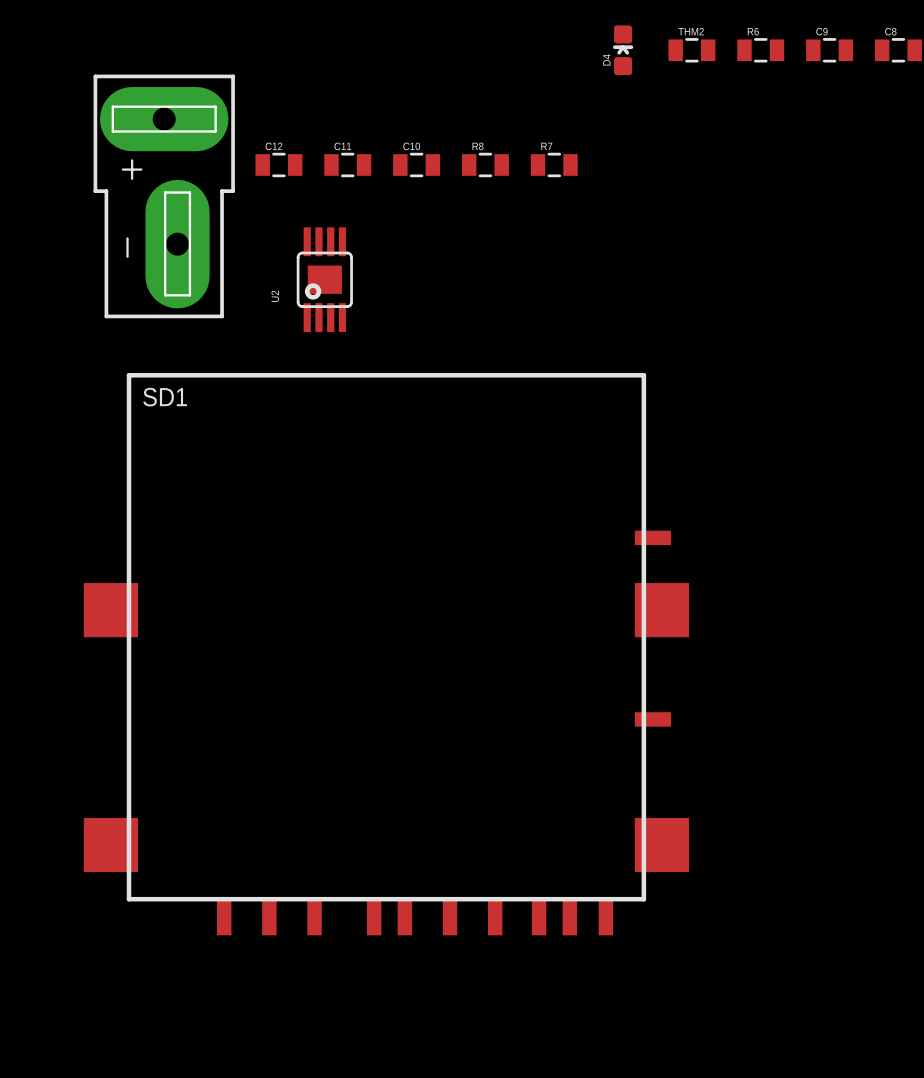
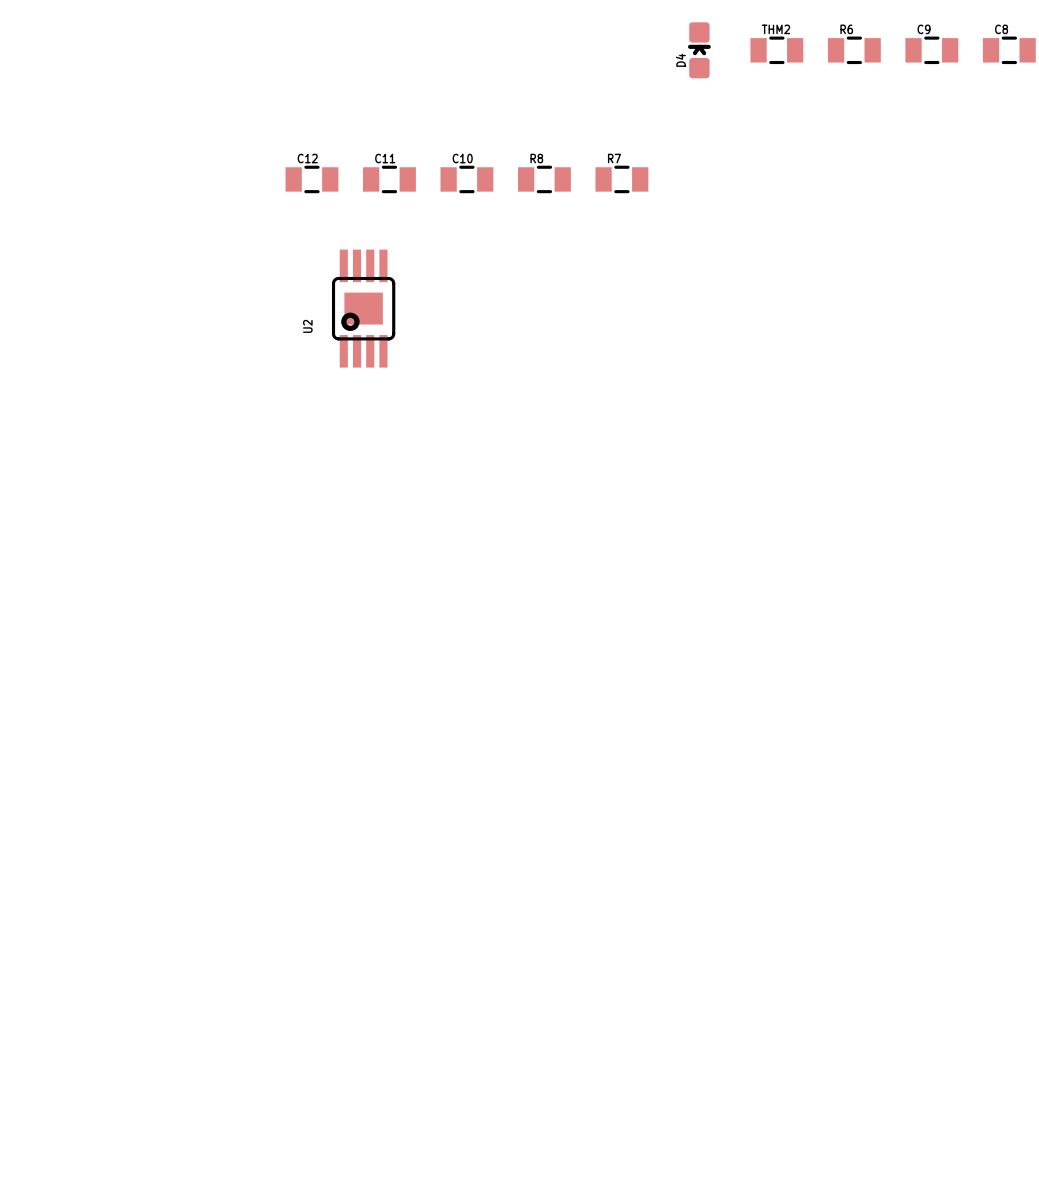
part: (164, 196) -> none
SD1: (386, 654) -> none

